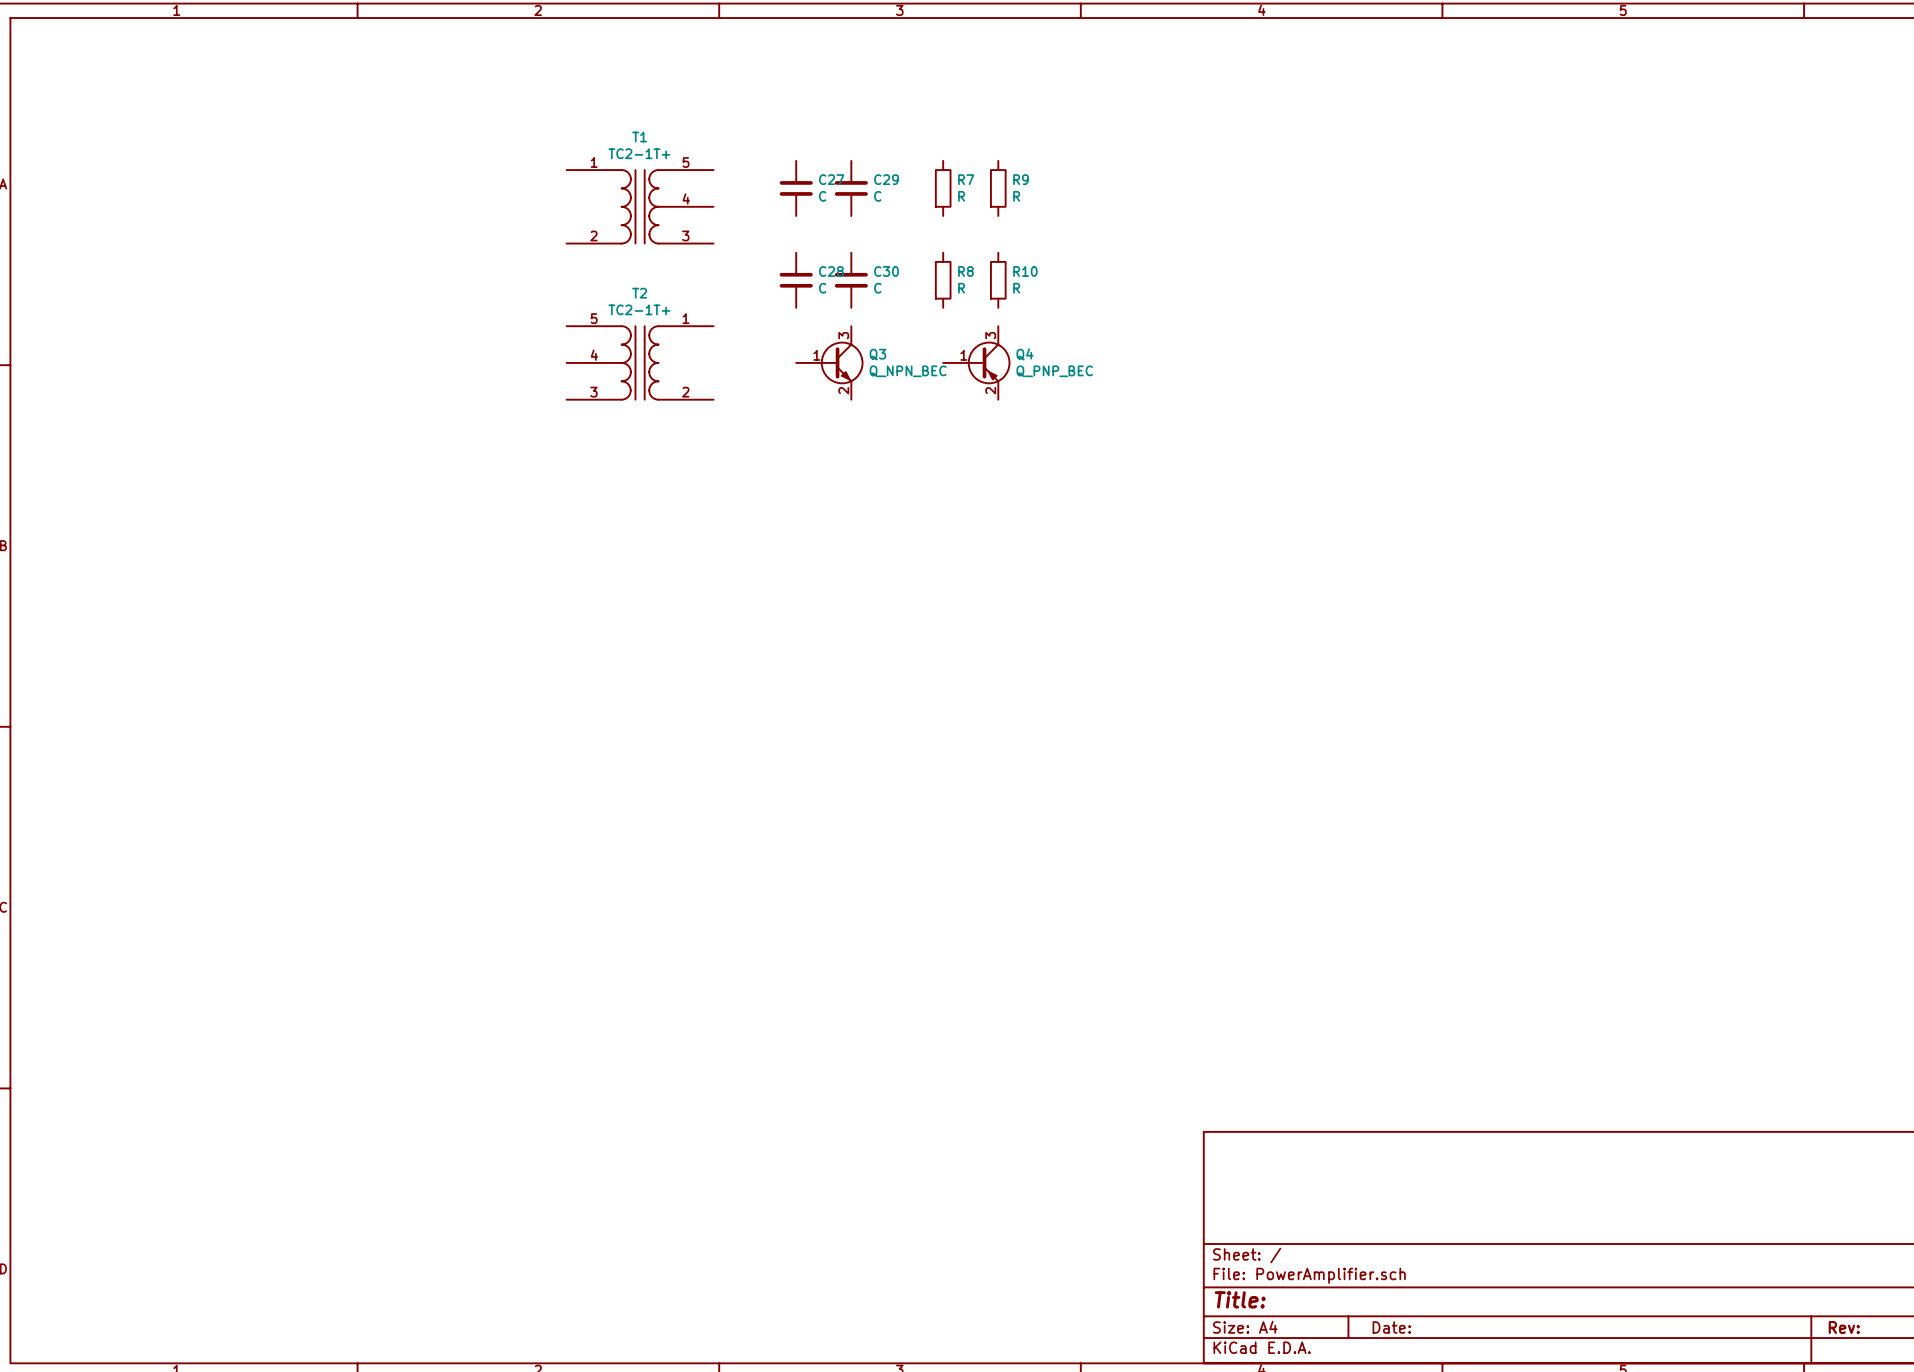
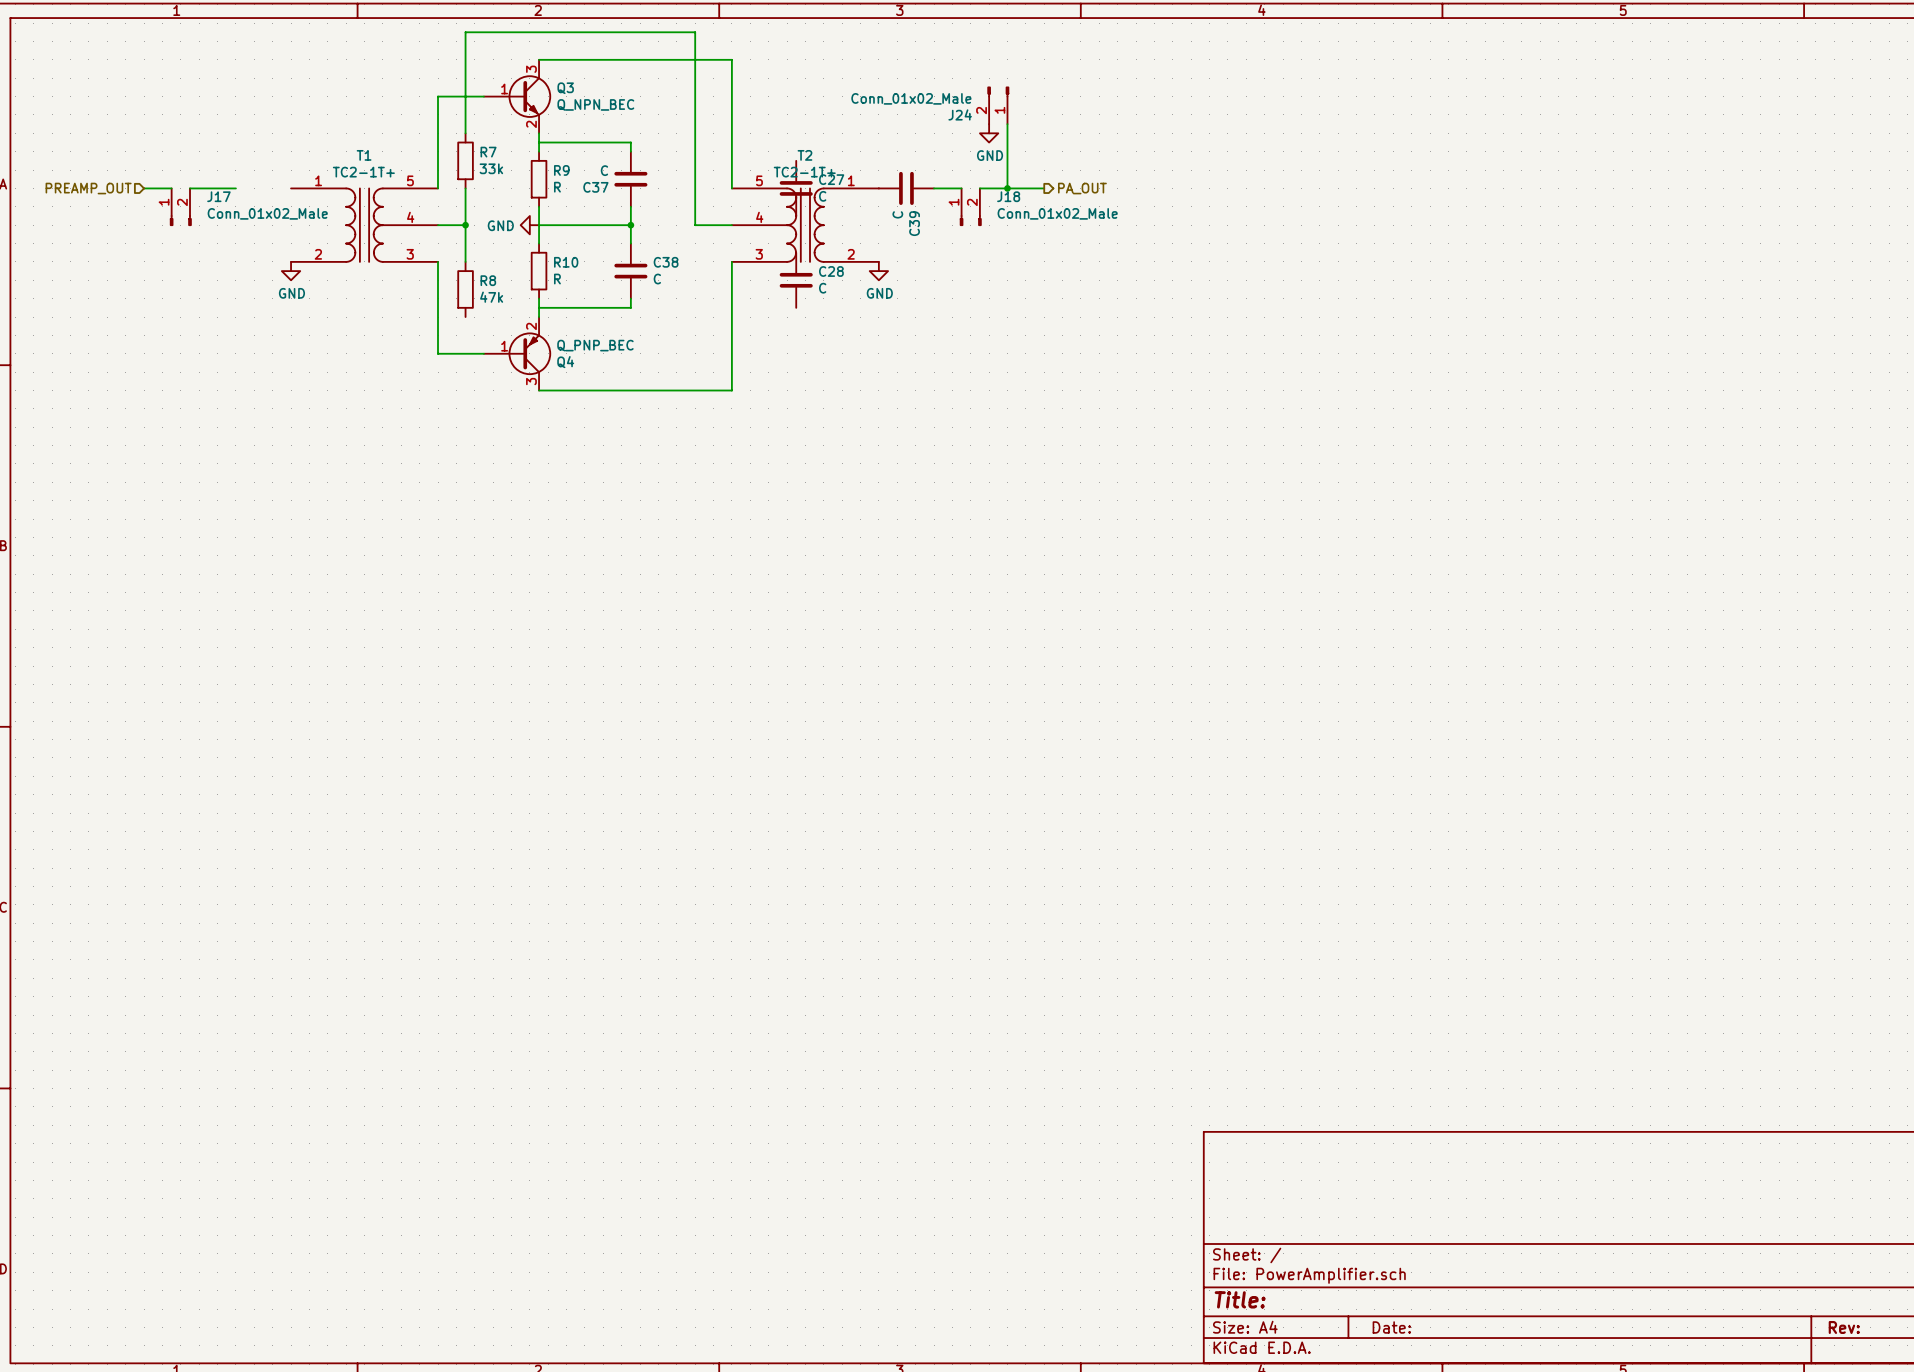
wire: none -> (539, 59) (731, 59) (731, 188)
wire: none -> (483, 96) (438, 96) (438, 188)
J24: none -> Conn_01x02_Male (998, 105)
wire: none -> (1007, 124) (1007, 188)
wire: none -> (465, 133) (465, 32) (695, 32) (695, 225) (731, 225)
wire: none -> (539, 133) (539, 151)
power symbol: none -> GND (989, 133)
wire: none -> (539, 142) (630, 142) (630, 151)
C37: none -> C (630, 179)
hierarchical label: none -> PREAMP_OUT (88, 188)
wire: none -> (144, 188) (171, 188)
wire: none -> (189, 188) (235, 188)
wire: none -> (465, 188) (465, 261)
C29: C (851, 188) -> none
C39: none -> C (906, 188)
wire: none -> (934, 188) (961, 188)
R7 position: (943, 188) -> (465, 160)
wire: none -> (979, 188) (1044, 188)
R9 position: (998, 188) -> (539, 179)
junction: none -> (1007, 188)
hierarchical label: none -> PA_OUT (1082, 188)
R7 value: R (961, 196) -> 33k (491, 168)
wire: none -> (539, 206) (539, 243)
wire: none -> (630, 206) (630, 243)
T1 position: (640, 206) -> (364, 225)
J17: none -> Conn_01x02_Male (180, 207)
J18: none -> Conn_01x02_Male (970, 207)
wire: none -> (438, 225) (465, 225)
junction: none -> (465, 225)
power symbol: none -> GND (529, 225)
wire: none -> (539, 225) (630, 225)
junction: none -> (630, 225)
wire: none -> (438, 261) (438, 353) (483, 353)
wire: none -> (731, 261) (731, 390) (539, 390)
power symbol: none -> GND (291, 271)
C38: none -> C (630, 271)
power symbol: none -> GND (878, 271)
C30: C (851, 280) -> none
R8 position: (943, 280) -> (465, 289)
R10 position: (998, 280) -> (539, 271)
R8 value: R (961, 288) -> 47k (491, 297)
wire: none -> (539, 298) (539, 317)
wire: none -> (630, 298) (630, 307) (539, 307)
T2 position: (640, 362) -> (805, 225)
Q3 position: (829, 362) -> (517, 96)
Q4 position: (976, 362) -> (517, 353)
Q4 flip: as is (989, 362) -> up-down (529, 353)

